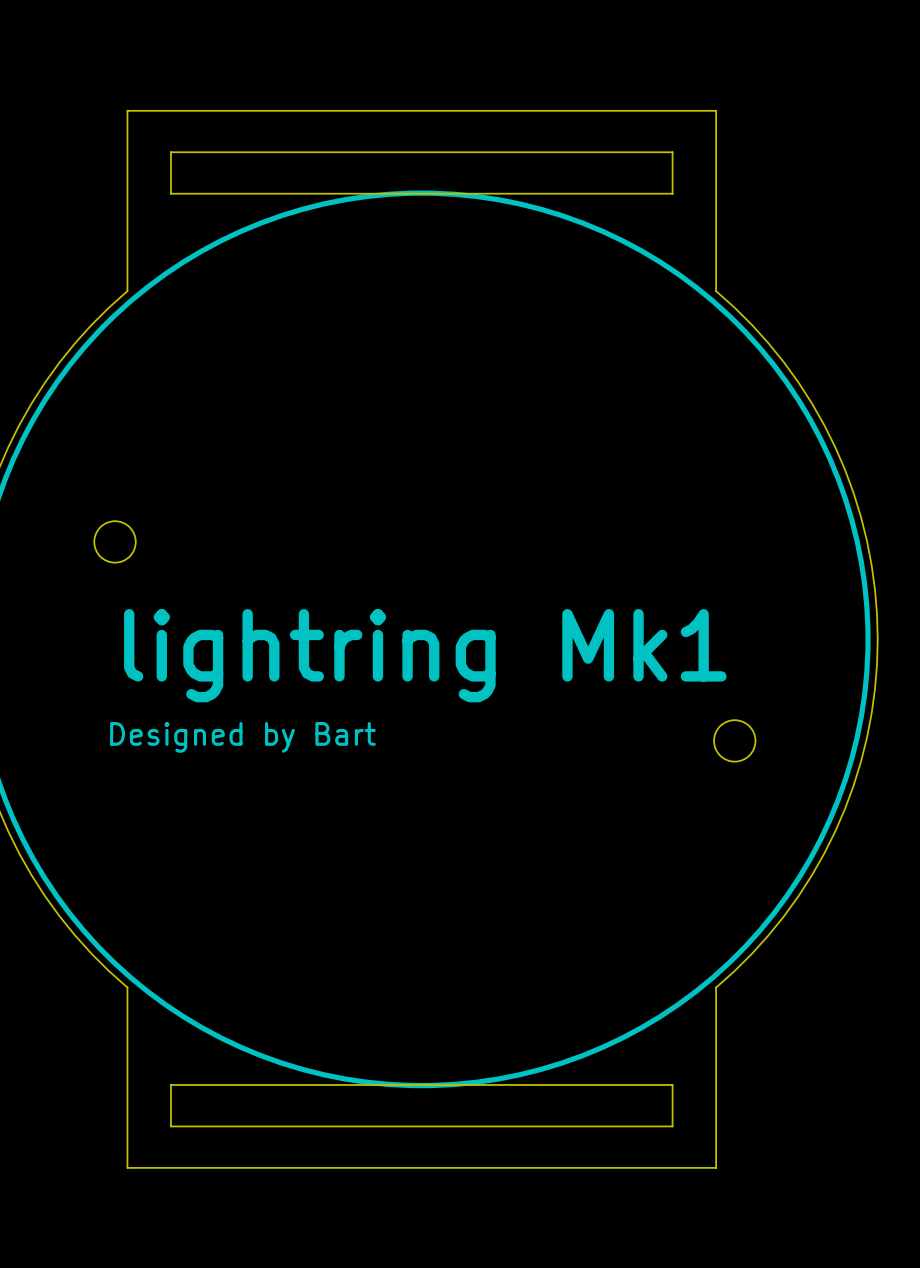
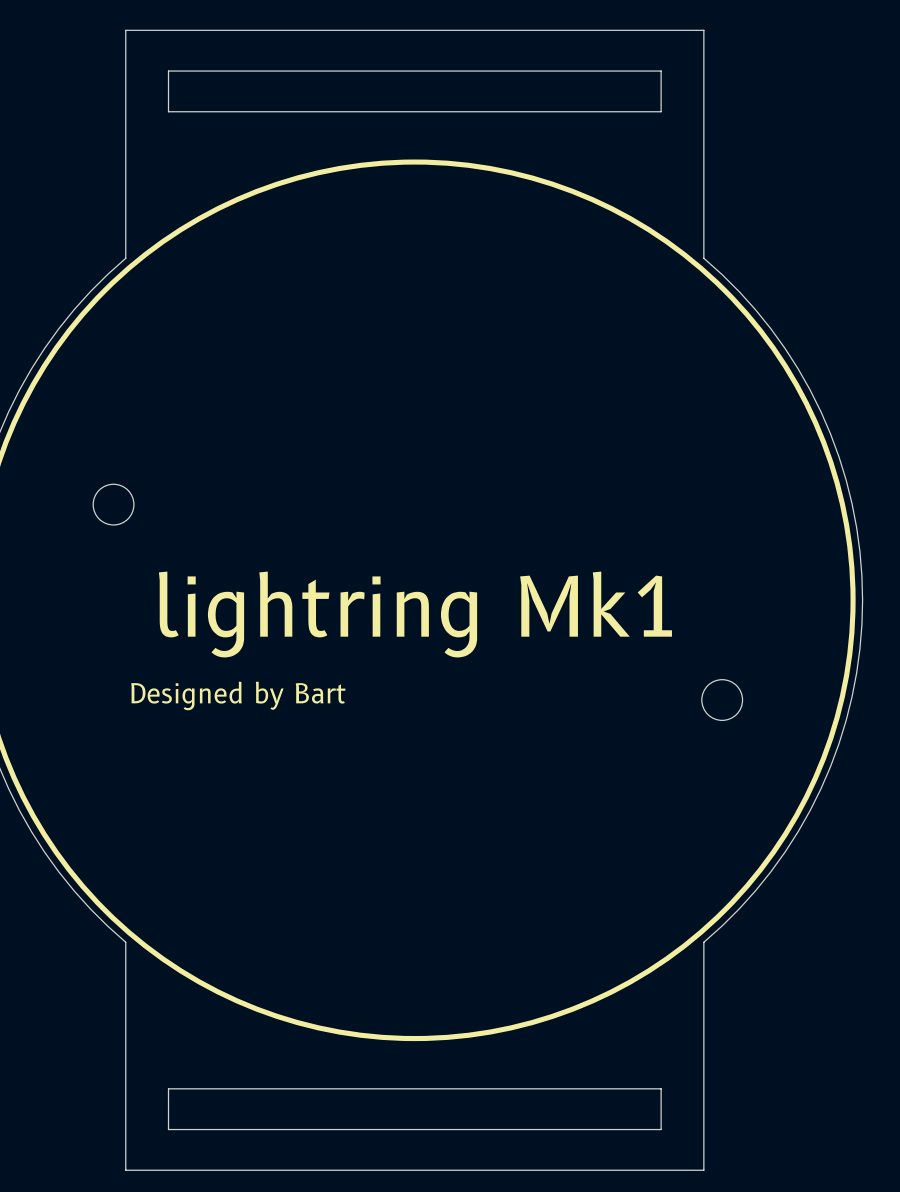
board edge: (716, 110) (127, 110) -> (703, 81) (703, 30) (125, 30) (125, 81)
board edge: (672, 152) (672, 193) (170, 193) (170, 152) (672, 152) -> (661, 71) (661, 111) (168, 111) (168, 71) (661, 71)
board edge: (672, 1084) (170, 1084) (170, 1126) (672, 1126) (672, 1084) -> (661, 1088) (168, 1088) (168, 1129) (661, 1129) (661, 1088)
board edge: (716, 1167) (127, 1167) -> (703, 1119) (703, 1170) (125, 1170) (125, 1119)

